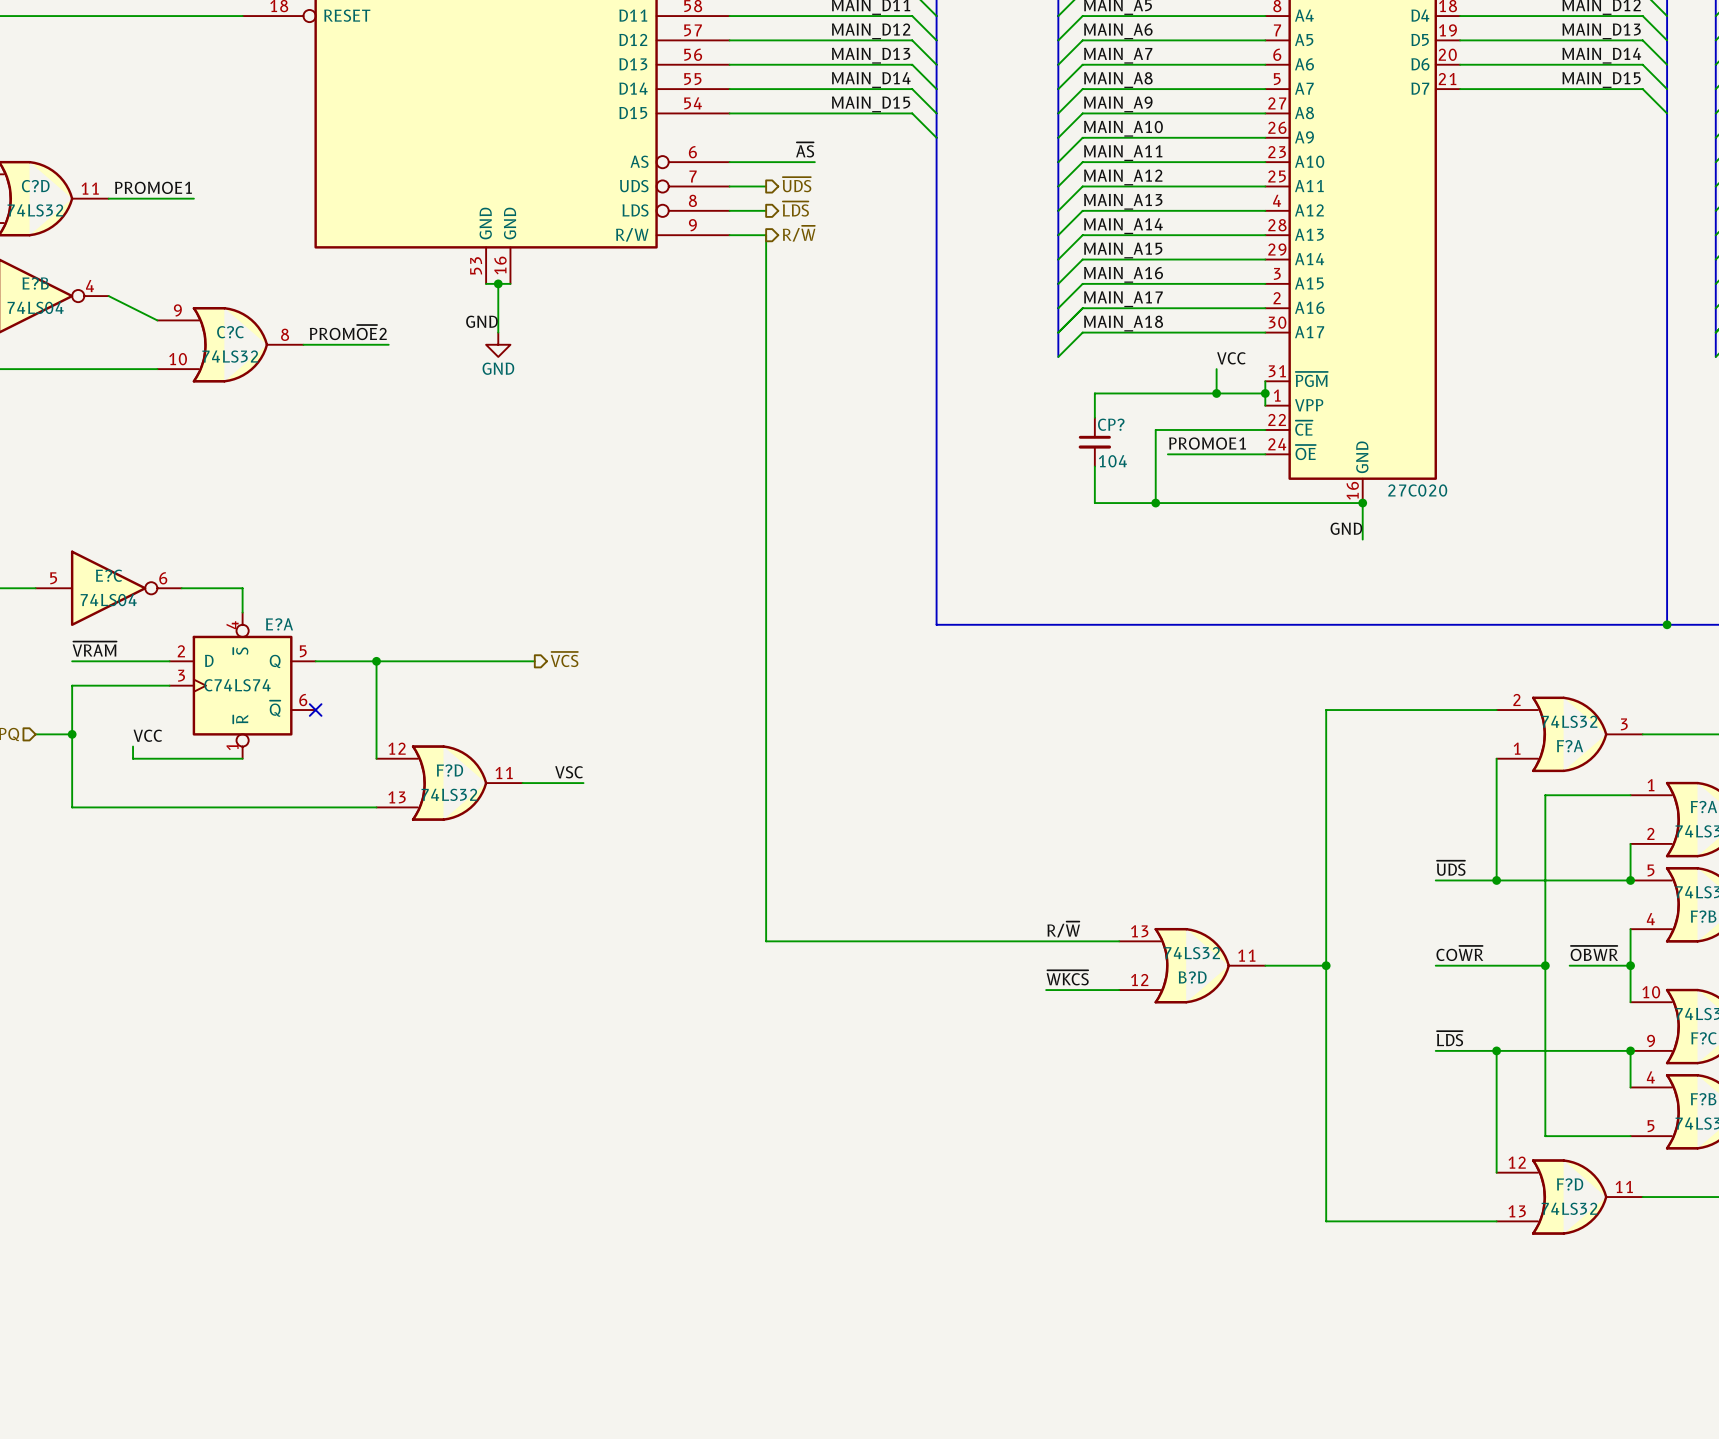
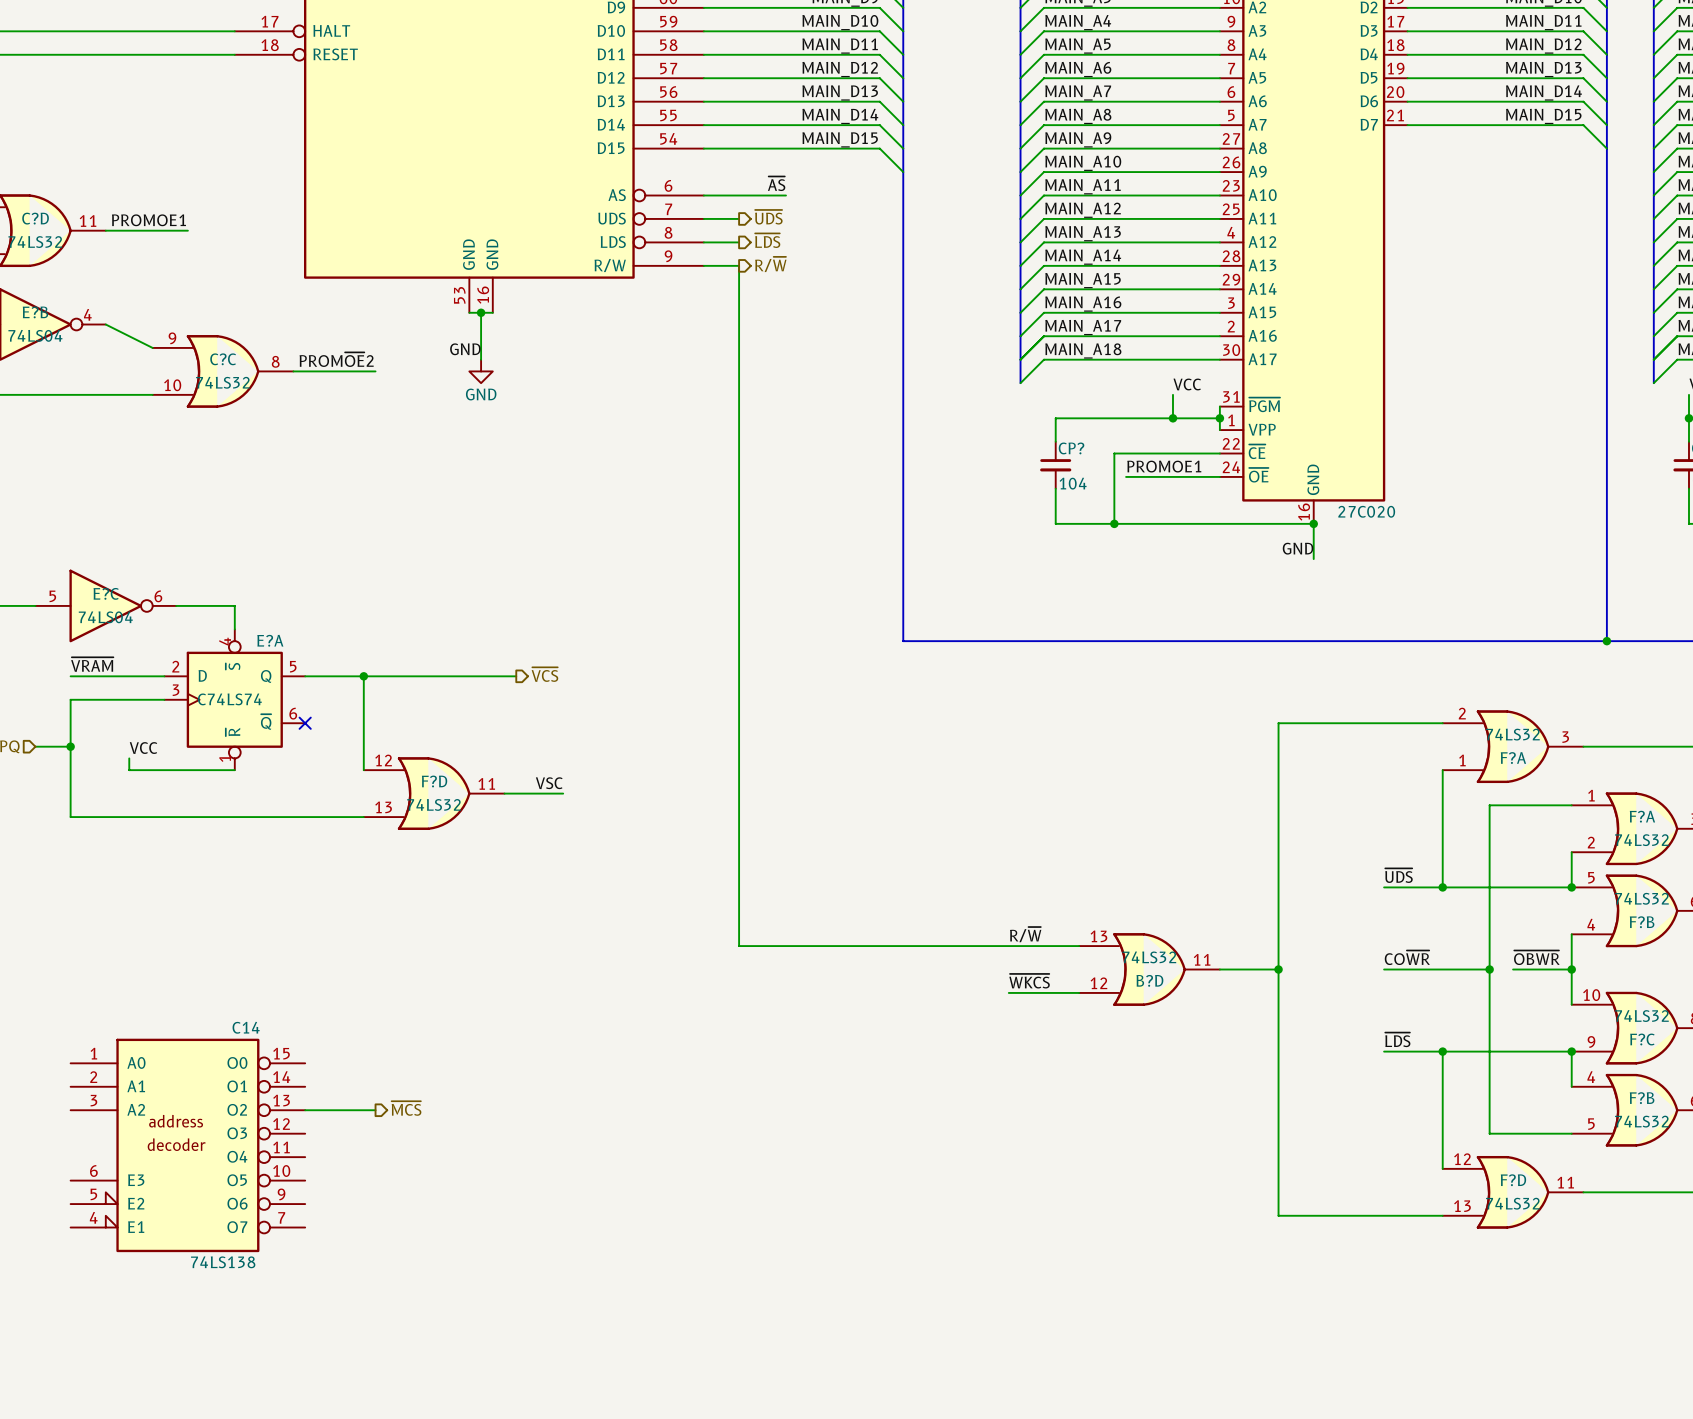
hierarchical label: none -> ~{MCS} (406, 1108)
wire: none -> (305, 1110) (375, 1110)
C14: none -> 74LS138 (187, 1145)

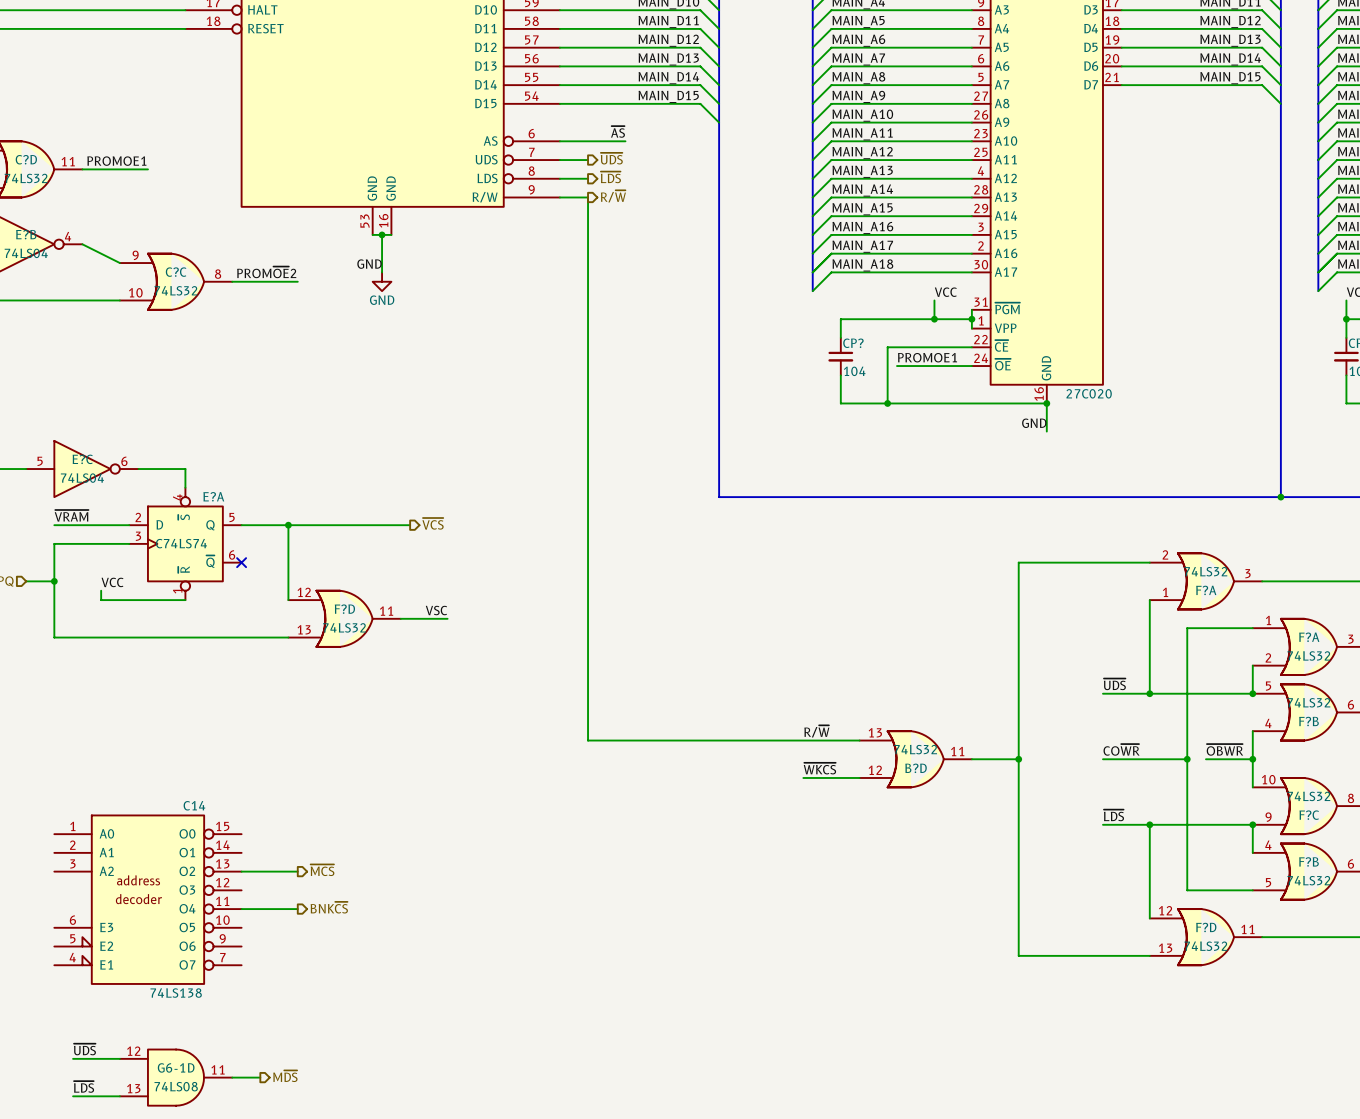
hierarchical label: none -> BNK~{CS} (329, 907)
wire: none -> (241, 909) (297, 909)
label: none -> ~{UDS} (84, 1049)
wire: none -> (73, 1058) (119, 1058)
hierarchical label: none -> M~{DS} (285, 1076)
G6-1D: none -> 74LS08 (176, 1077)
wire: none -> (232, 1077) (260, 1077)
label: none -> ~{LDS} (84, 1086)
wire: none -> (73, 1096) (119, 1096)

